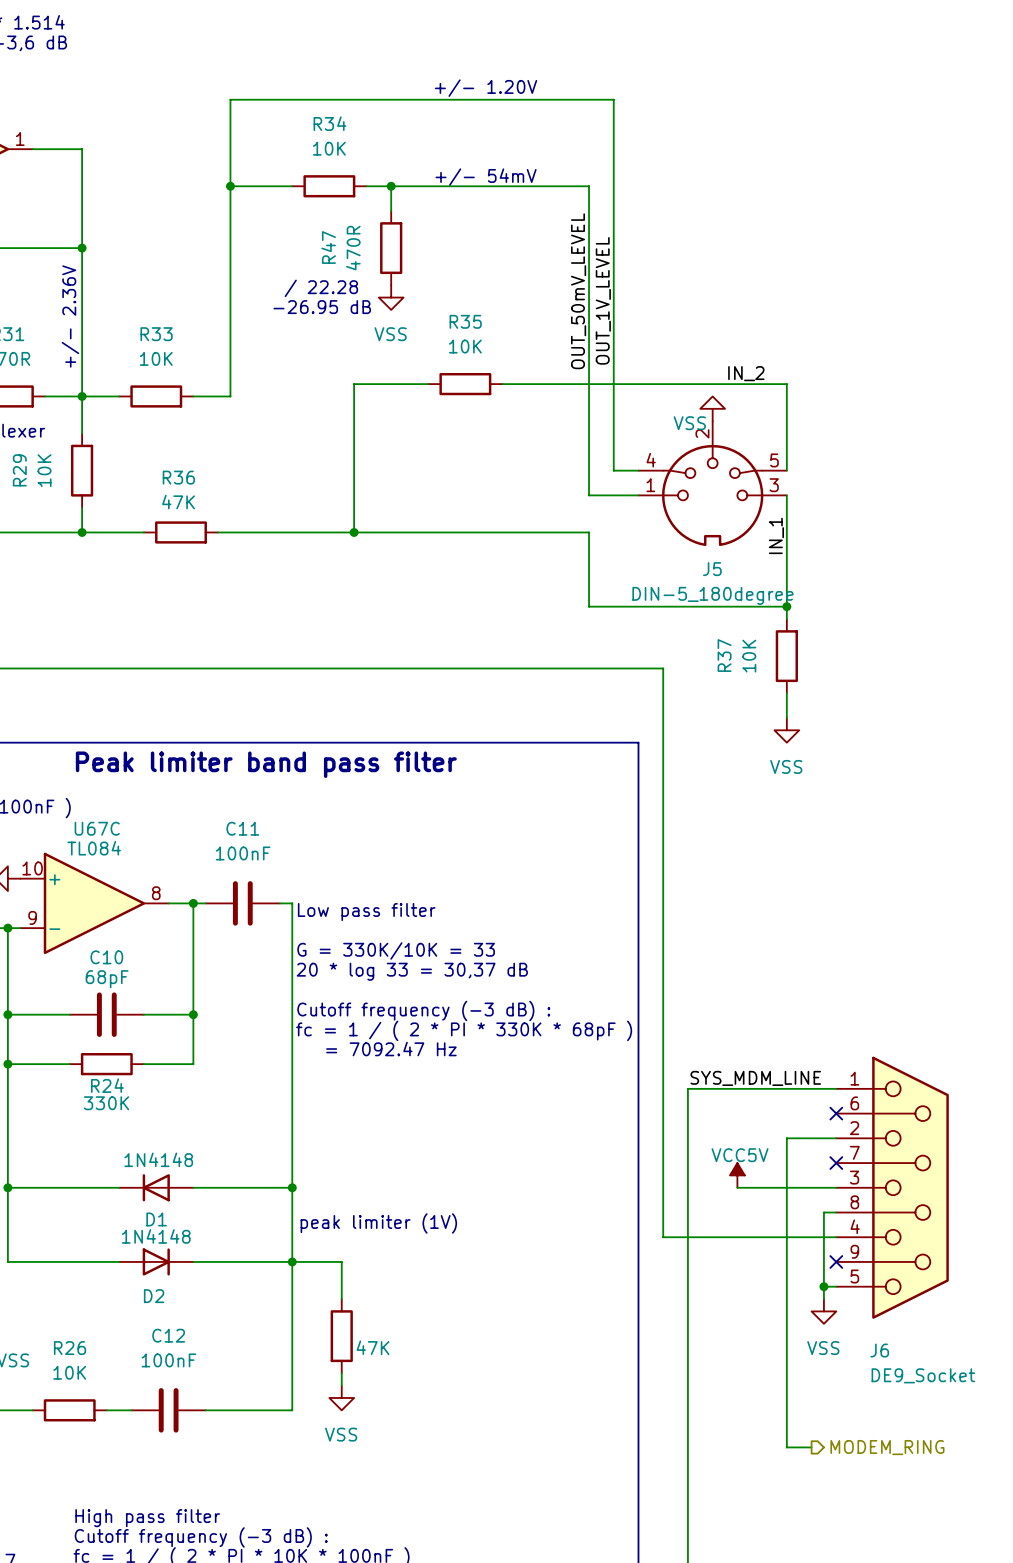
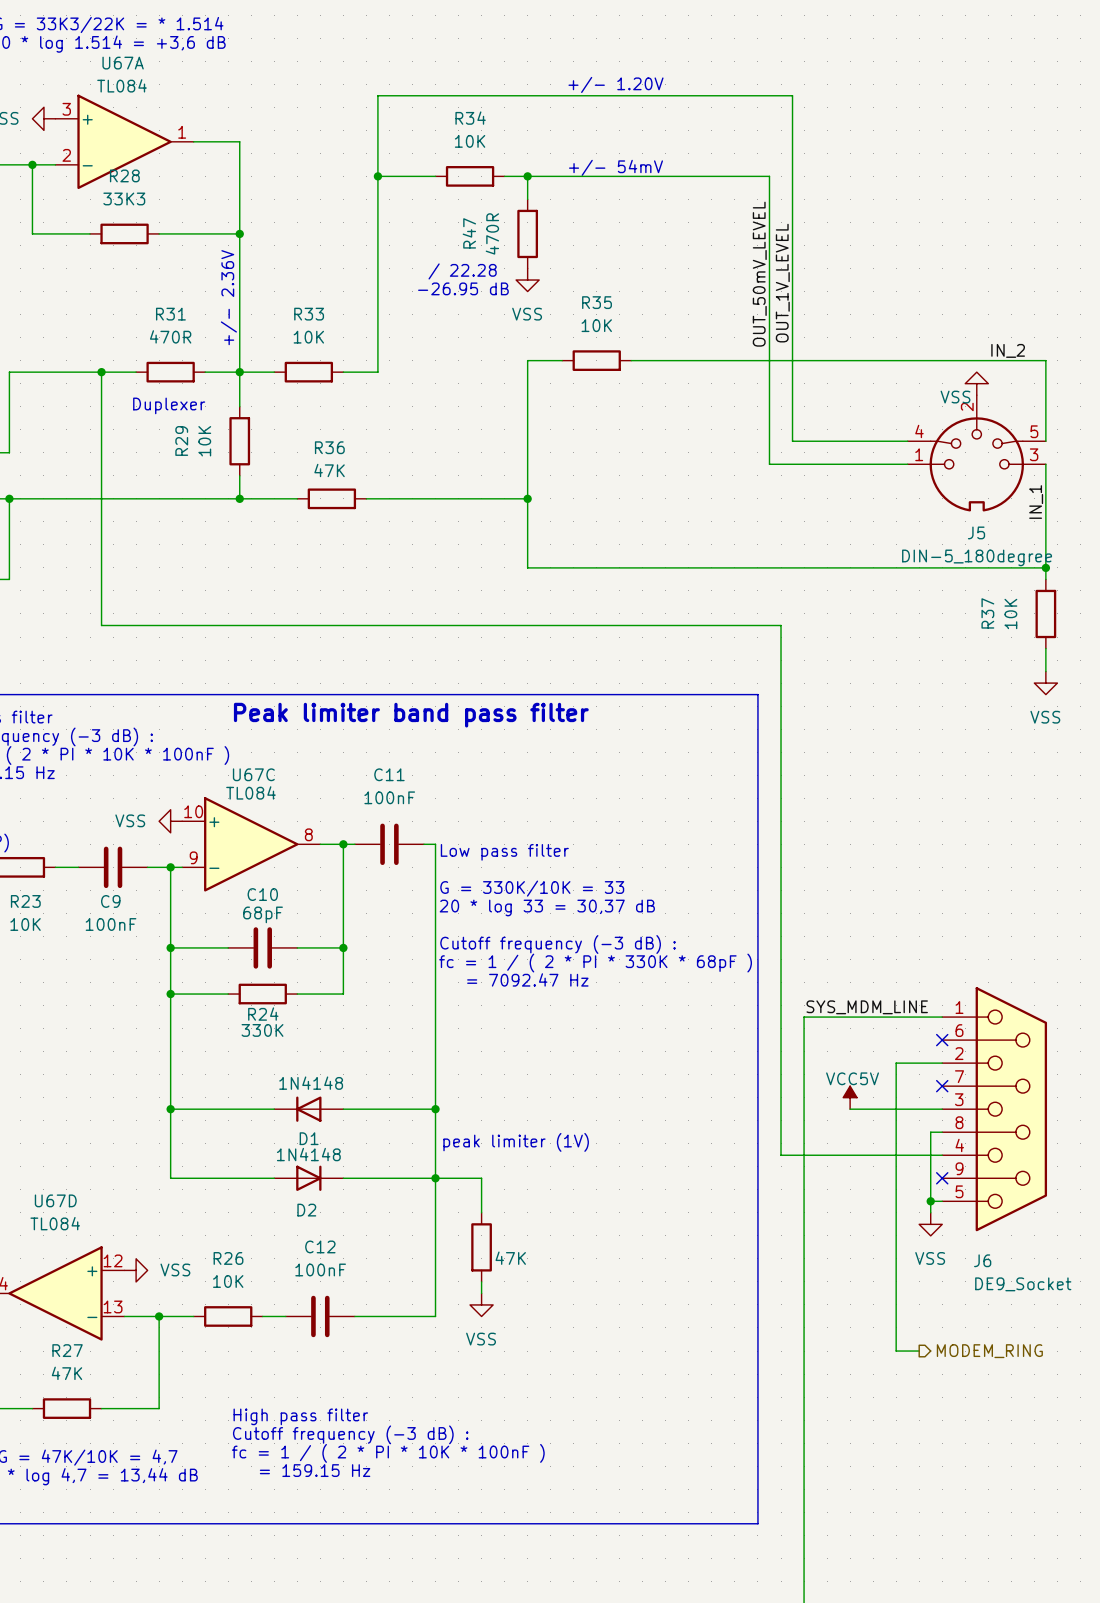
wire: (613, 99) (613, 470) (638, 470) -> (734, 95) (792, 95) (792, 441) (907, 441)
wire: (589, 186) (589, 495) (638, 495) -> (711, 176) (769, 176) (769, 464) (907, 464)
label position: OUT_50mV_LEVEL (578, 291) -> OUT_50mV_LEVEL (759, 274)
label position: OUT_1V_LEVEL (603, 300) -> OUT_1V_LEVEL (782, 283)
label position: IN_2 (746, 373) -> IN_2 (1008, 350)
wire: (391, 384) (354, 384) (354, 532) -> none
wire: (786, 384) (786, 470) -> (896, 360) (1045, 360) (1045, 441)
power symbol position: VSS (712, 408) -> VSS (976, 383)
J5 position: (712, 483) -> (976, 453)
wire: (786, 495) (786, 619) -> (1045, 464) (1045, 579)
junction position: (354, 532) -> (527, 498)
wire: (391, 532) (589, 532) (589, 606) -> (527, 360) (527, 567) (711, 567)
label position: IN_1 (776, 535) -> IN_1 (1036, 502)
wire: none -> (896, 567) (1045, 567)
junction: (786, 606) -> none
junction: none -> (1045, 567)
R37 position: (786, 656) -> (1045, 613)
wire: (786, 693) (786, 717) -> (1045, 648) (1045, 671)
power symbol position: VSS (786, 730) -> VSS (1045, 683)

